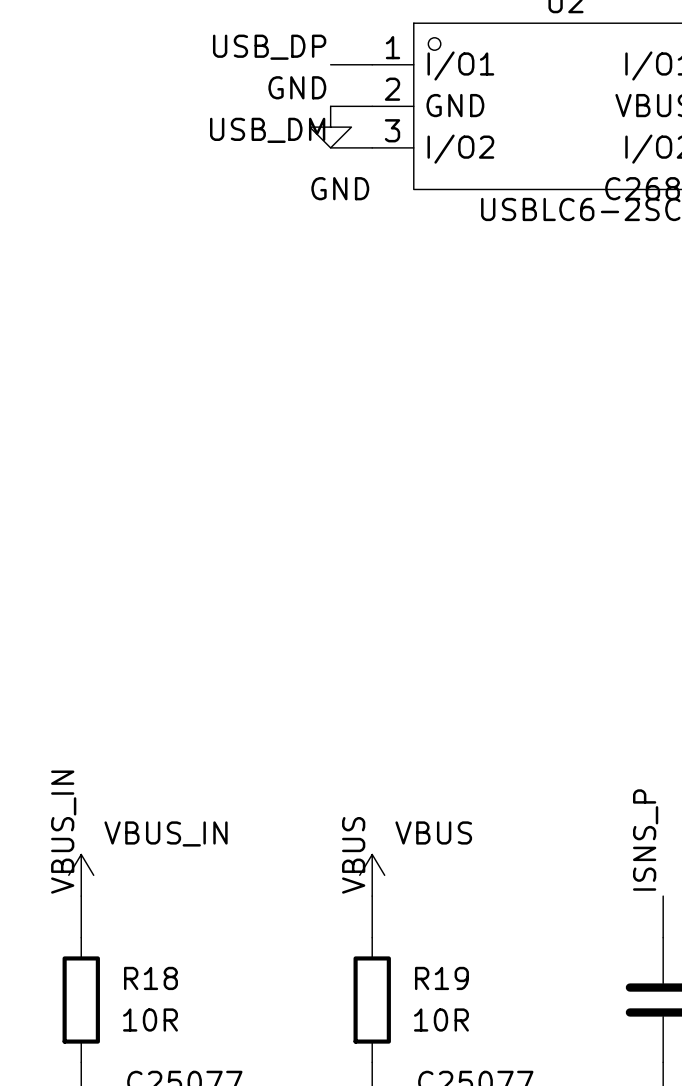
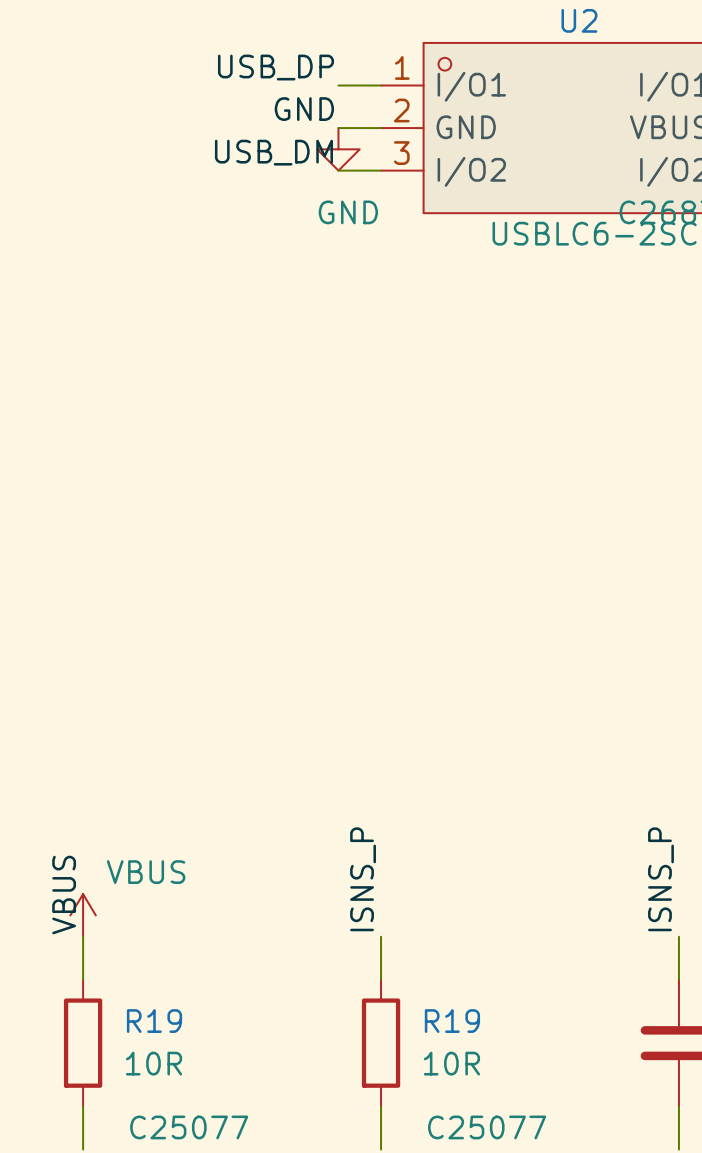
label: VBUS_IN (63, 832) -> VBUS (64, 895)
label: VBUS (353, 855) -> ISNS_P (363, 879)
power symbol: VBUS_IN (81, 875) -> VBUS (83, 915)
power symbol: VBUS (372, 875) -> none
R18 name: R18 (150, 978) -> R19 (154, 1021)

